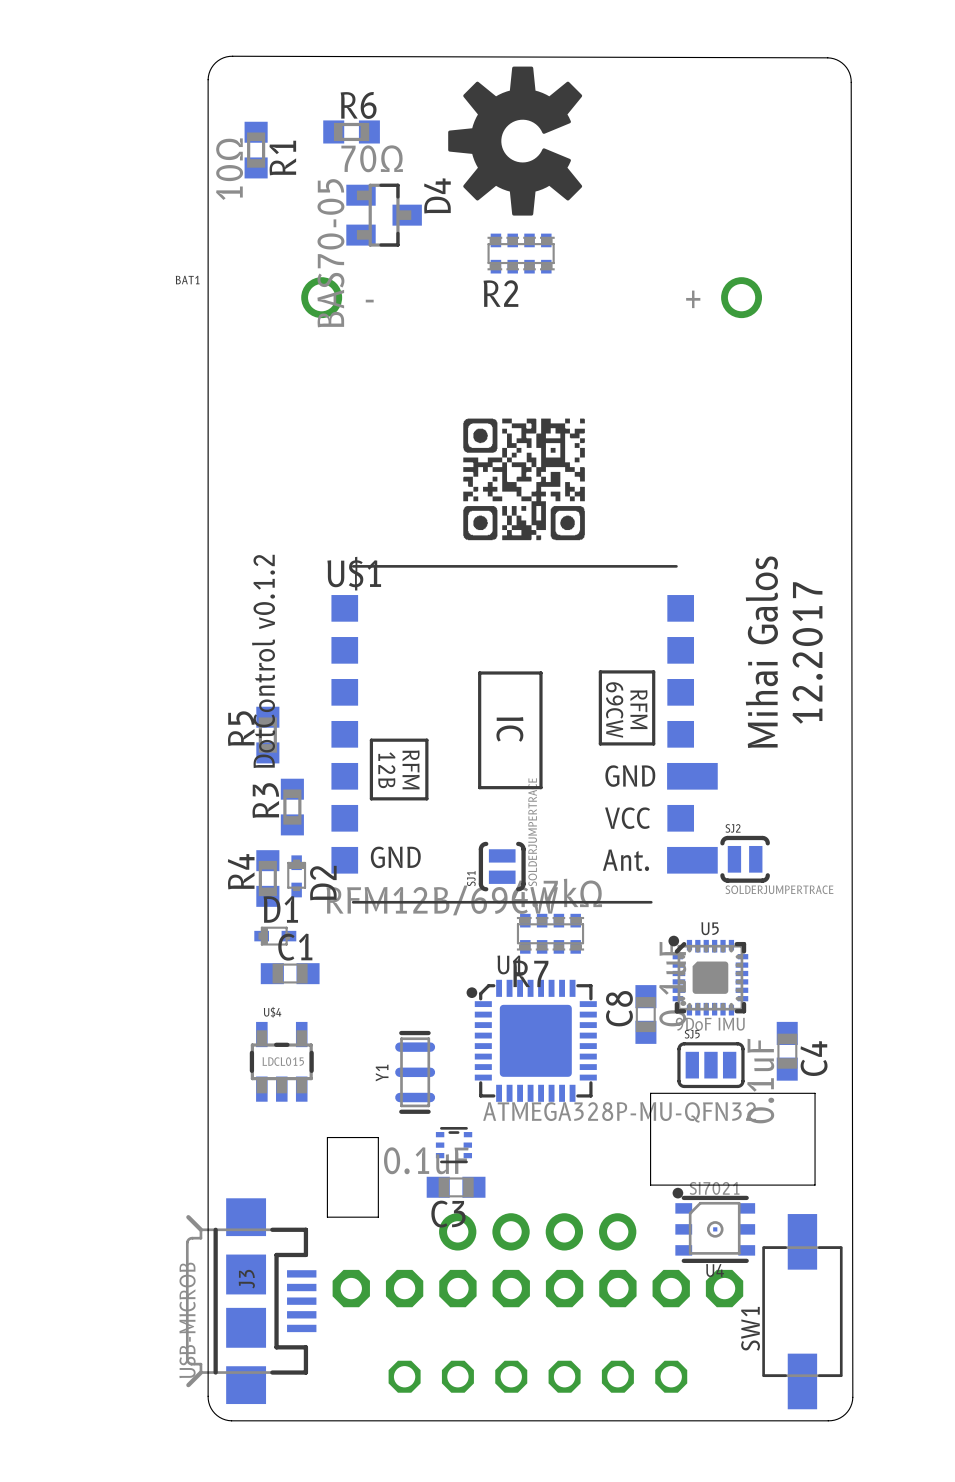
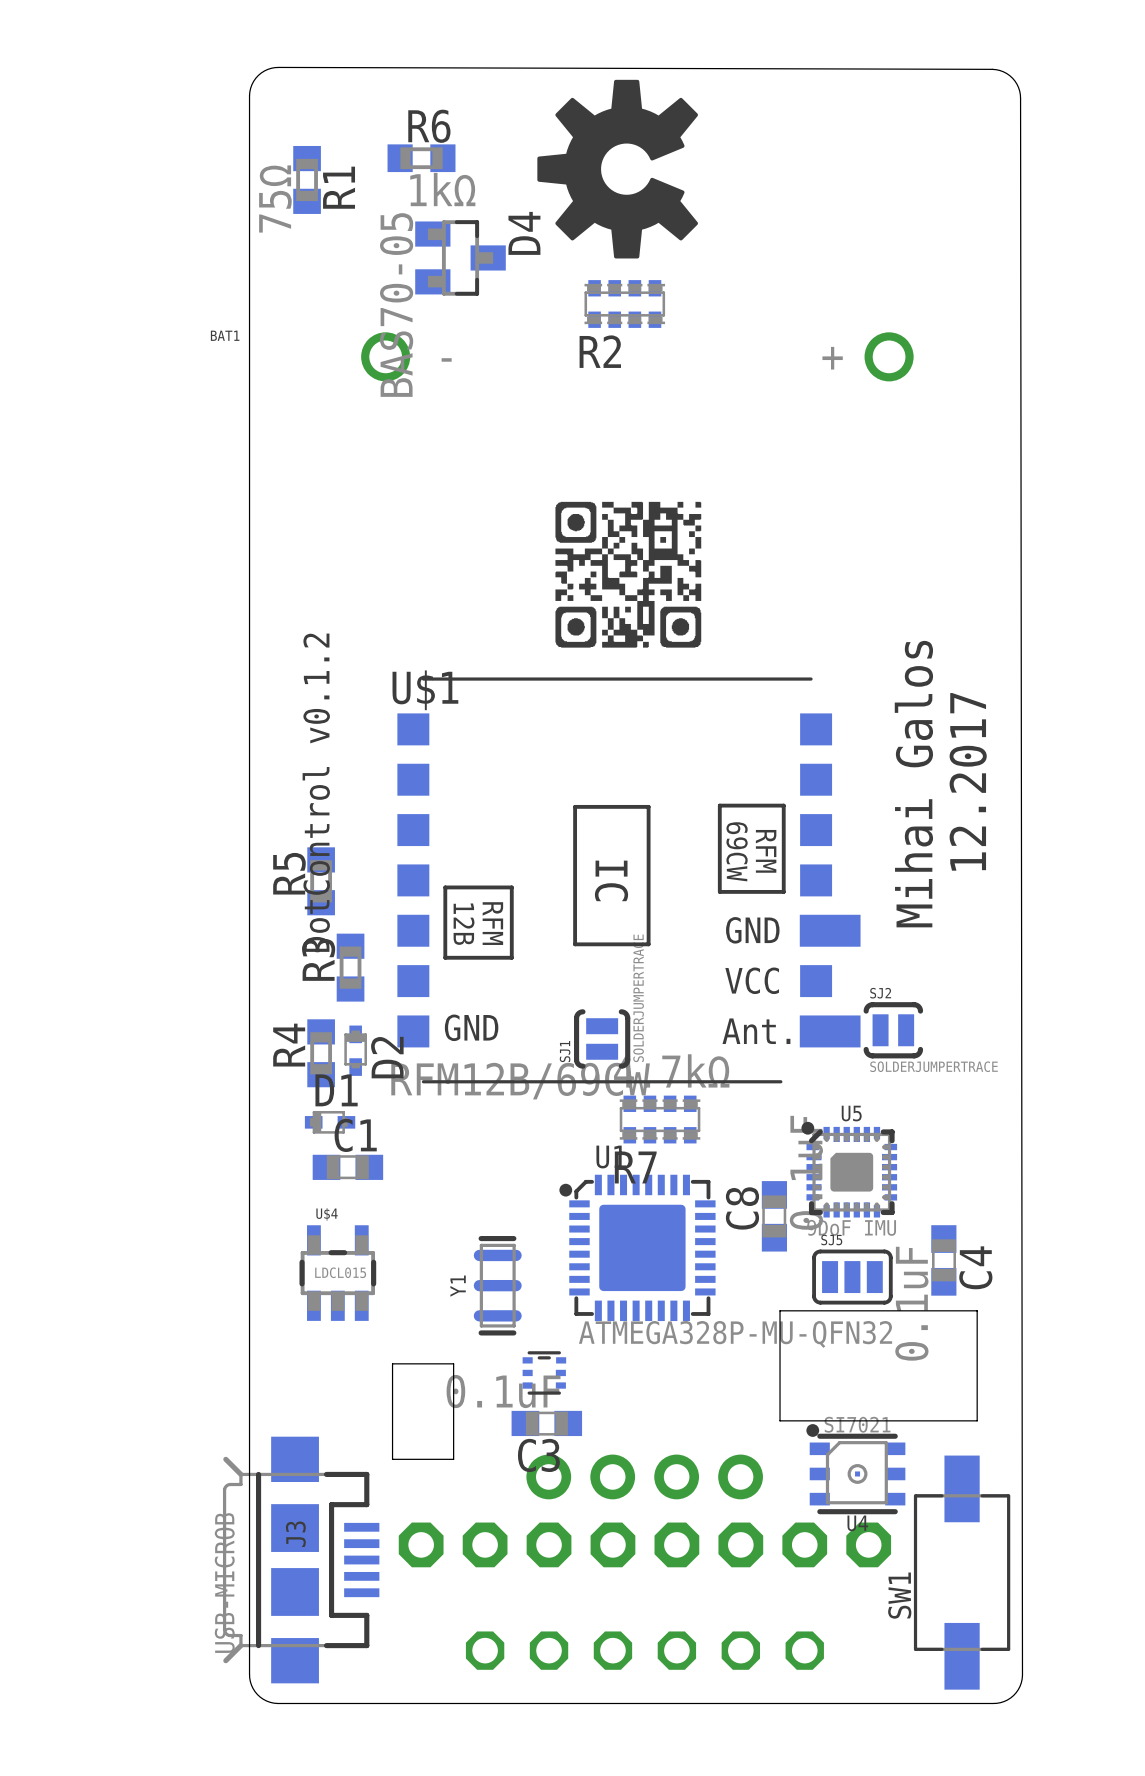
R6 value: 70Ω (372, 158) -> 1kΩ (442, 189)
R1 value: 10Ω (229, 169) -> 75Ω (275, 198)

